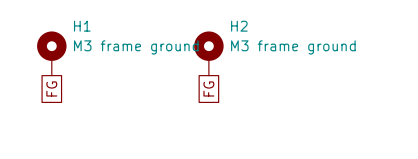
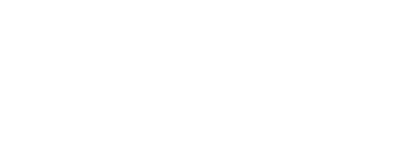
H1: M3 frame ground (51, 53) -> none
H2: M3 frame ground (208, 53) -> none
global label: FG (51, 88) -> none
global label: FG (208, 88) -> none

